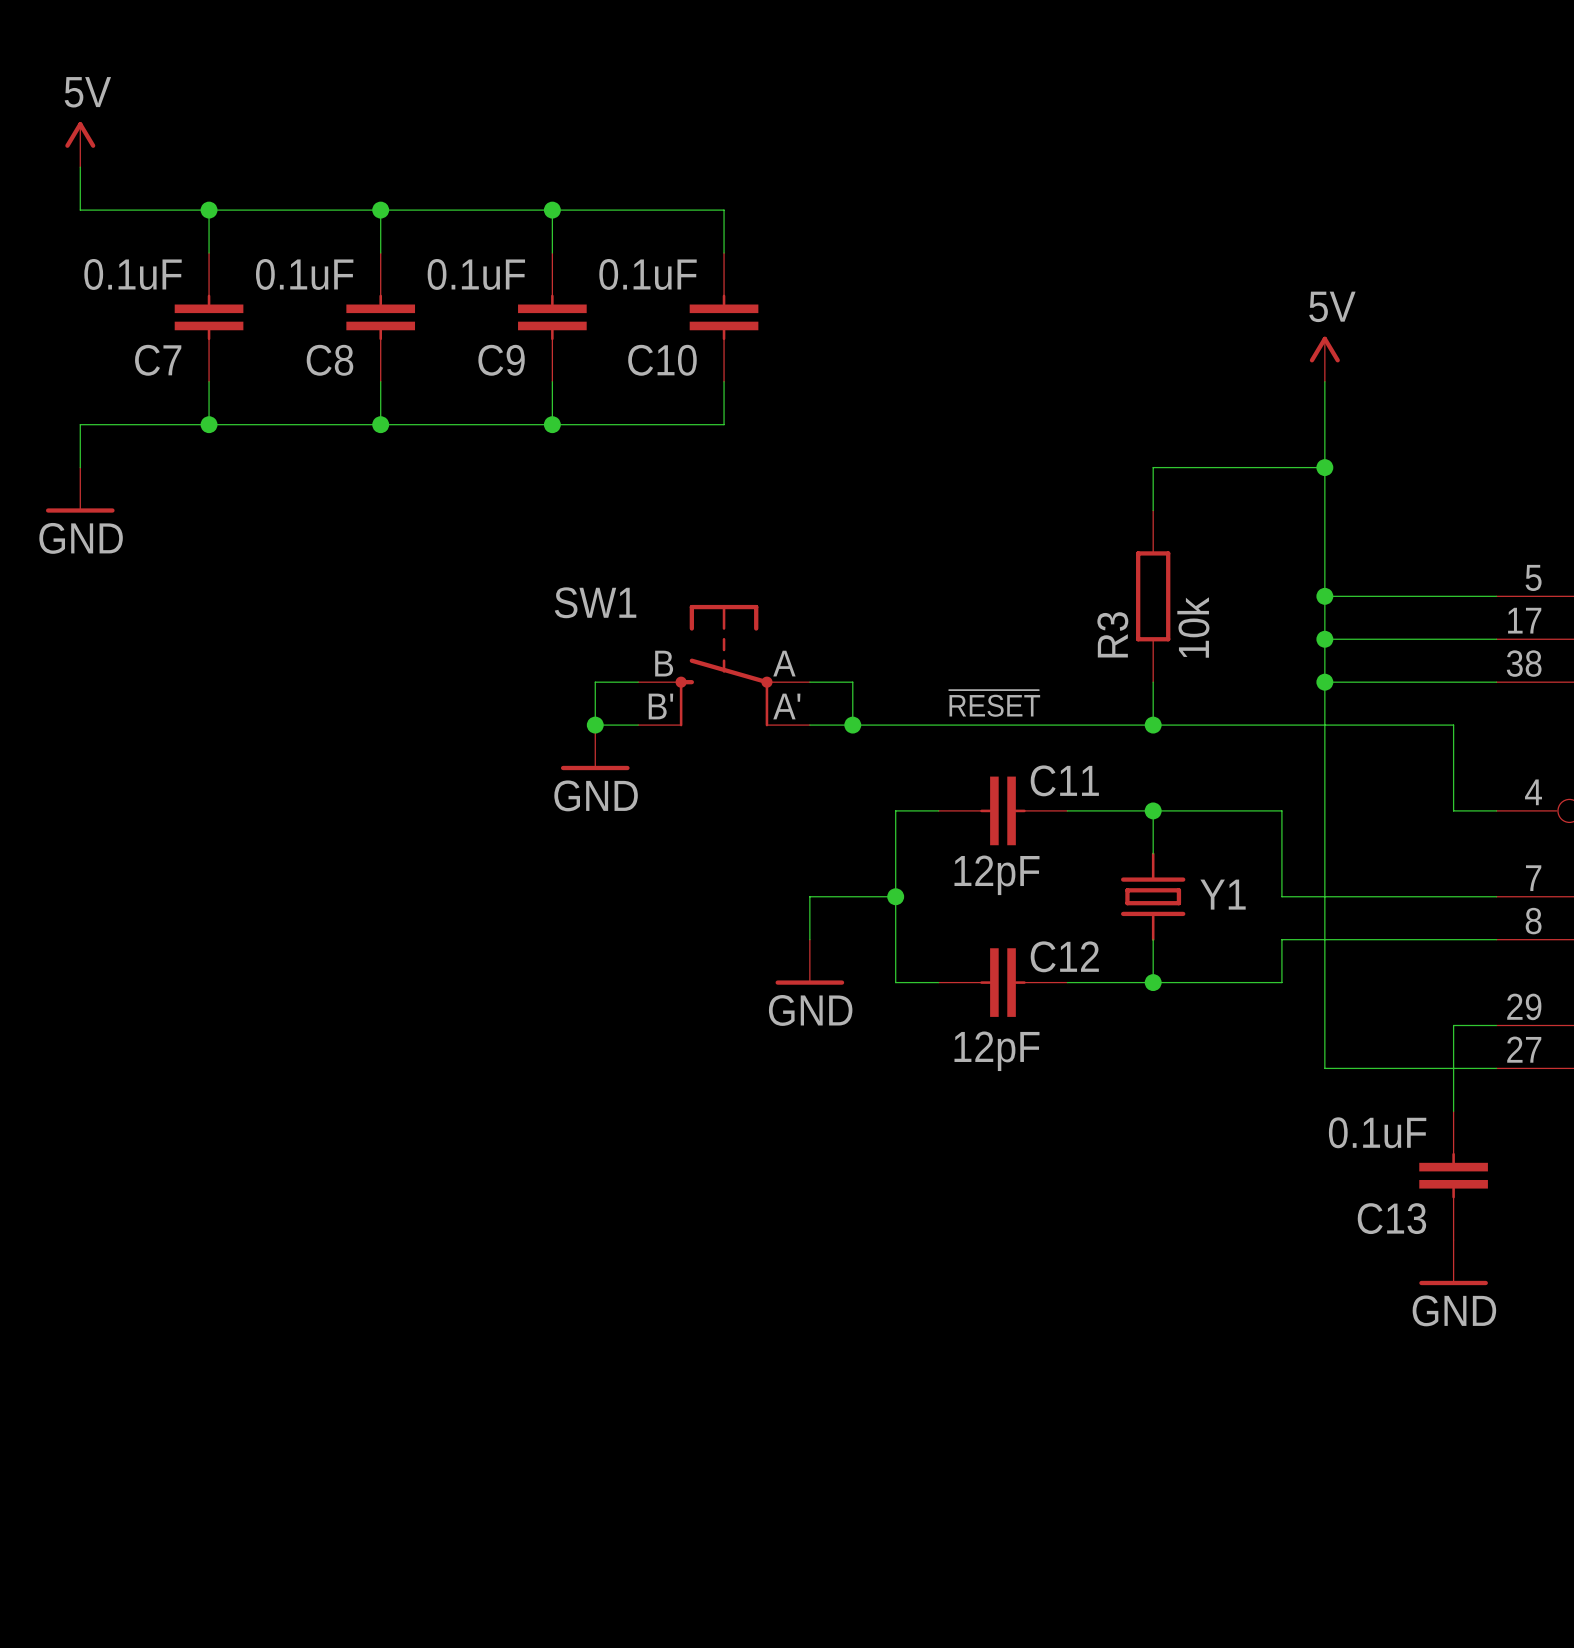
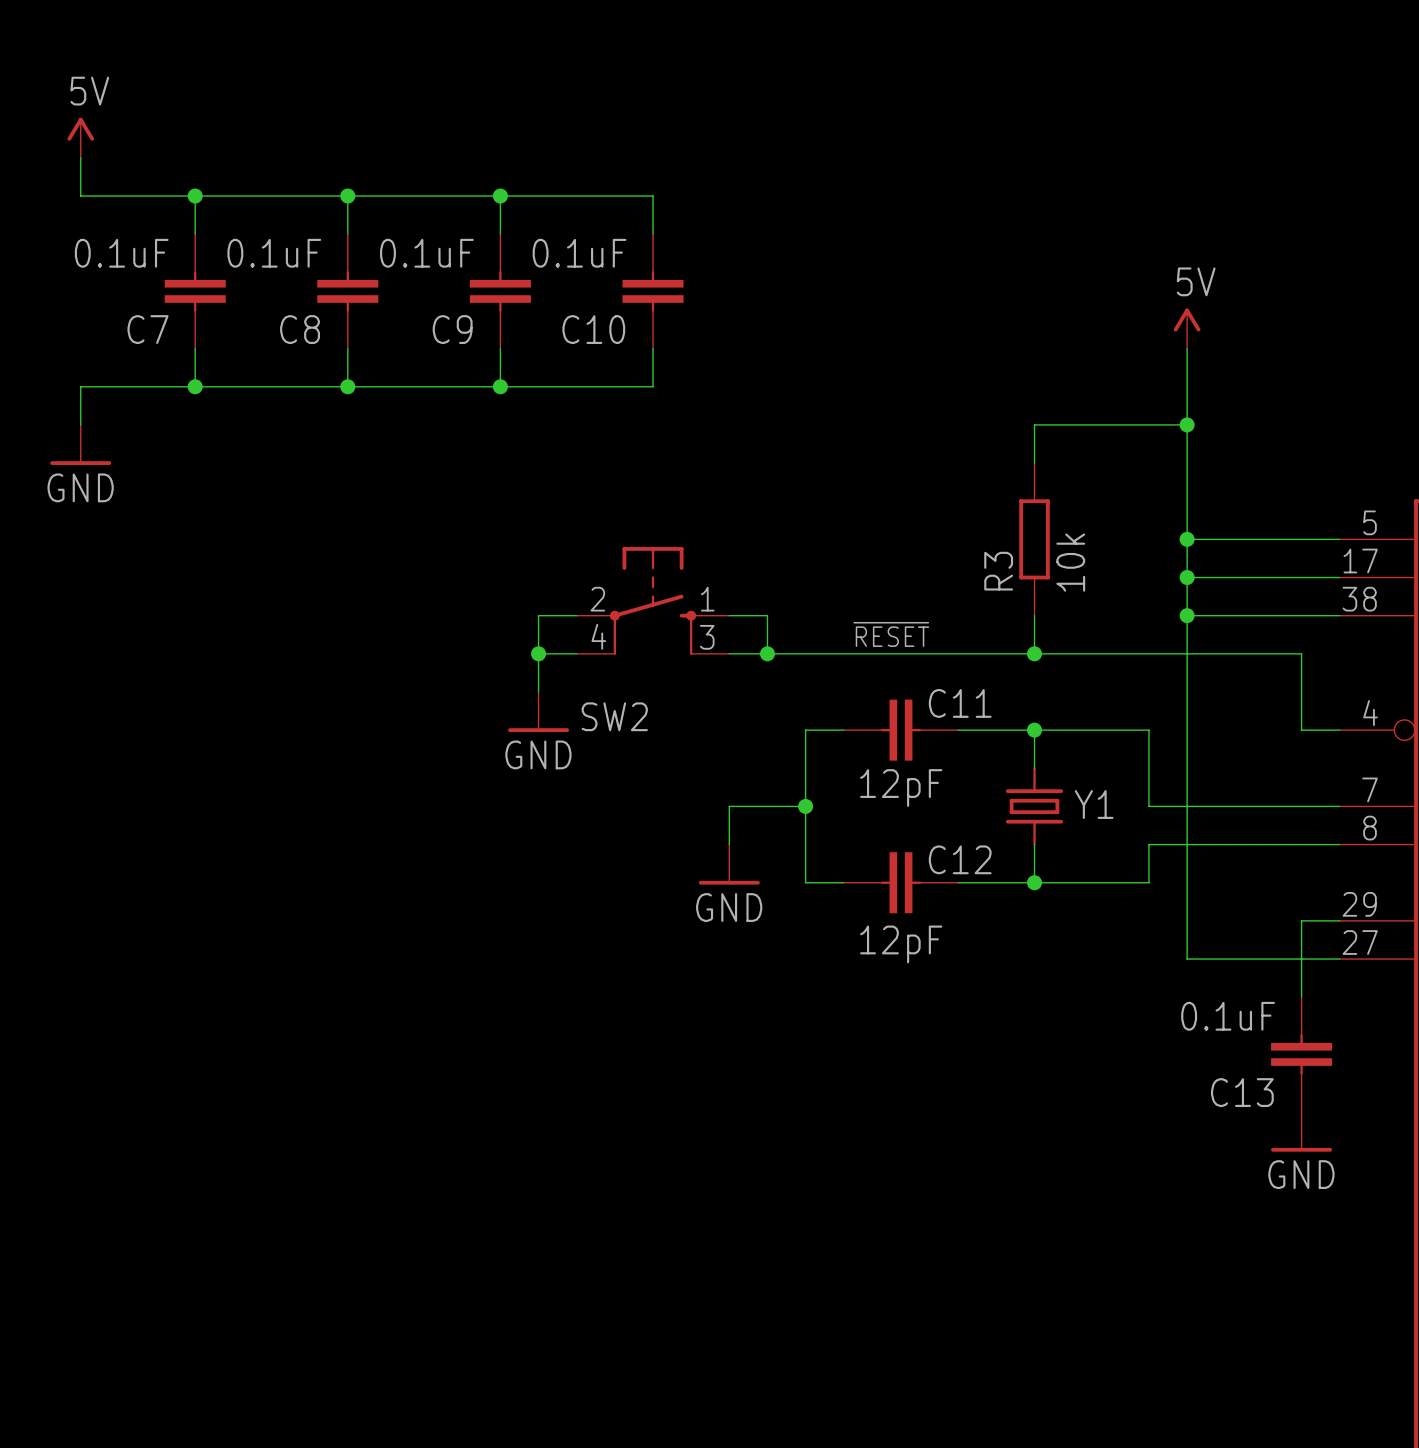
SW1: (724, 665) -> none
SW2: none -> (653, 600)
power symbol position: GND (595, 747) -> GND (538, 712)

